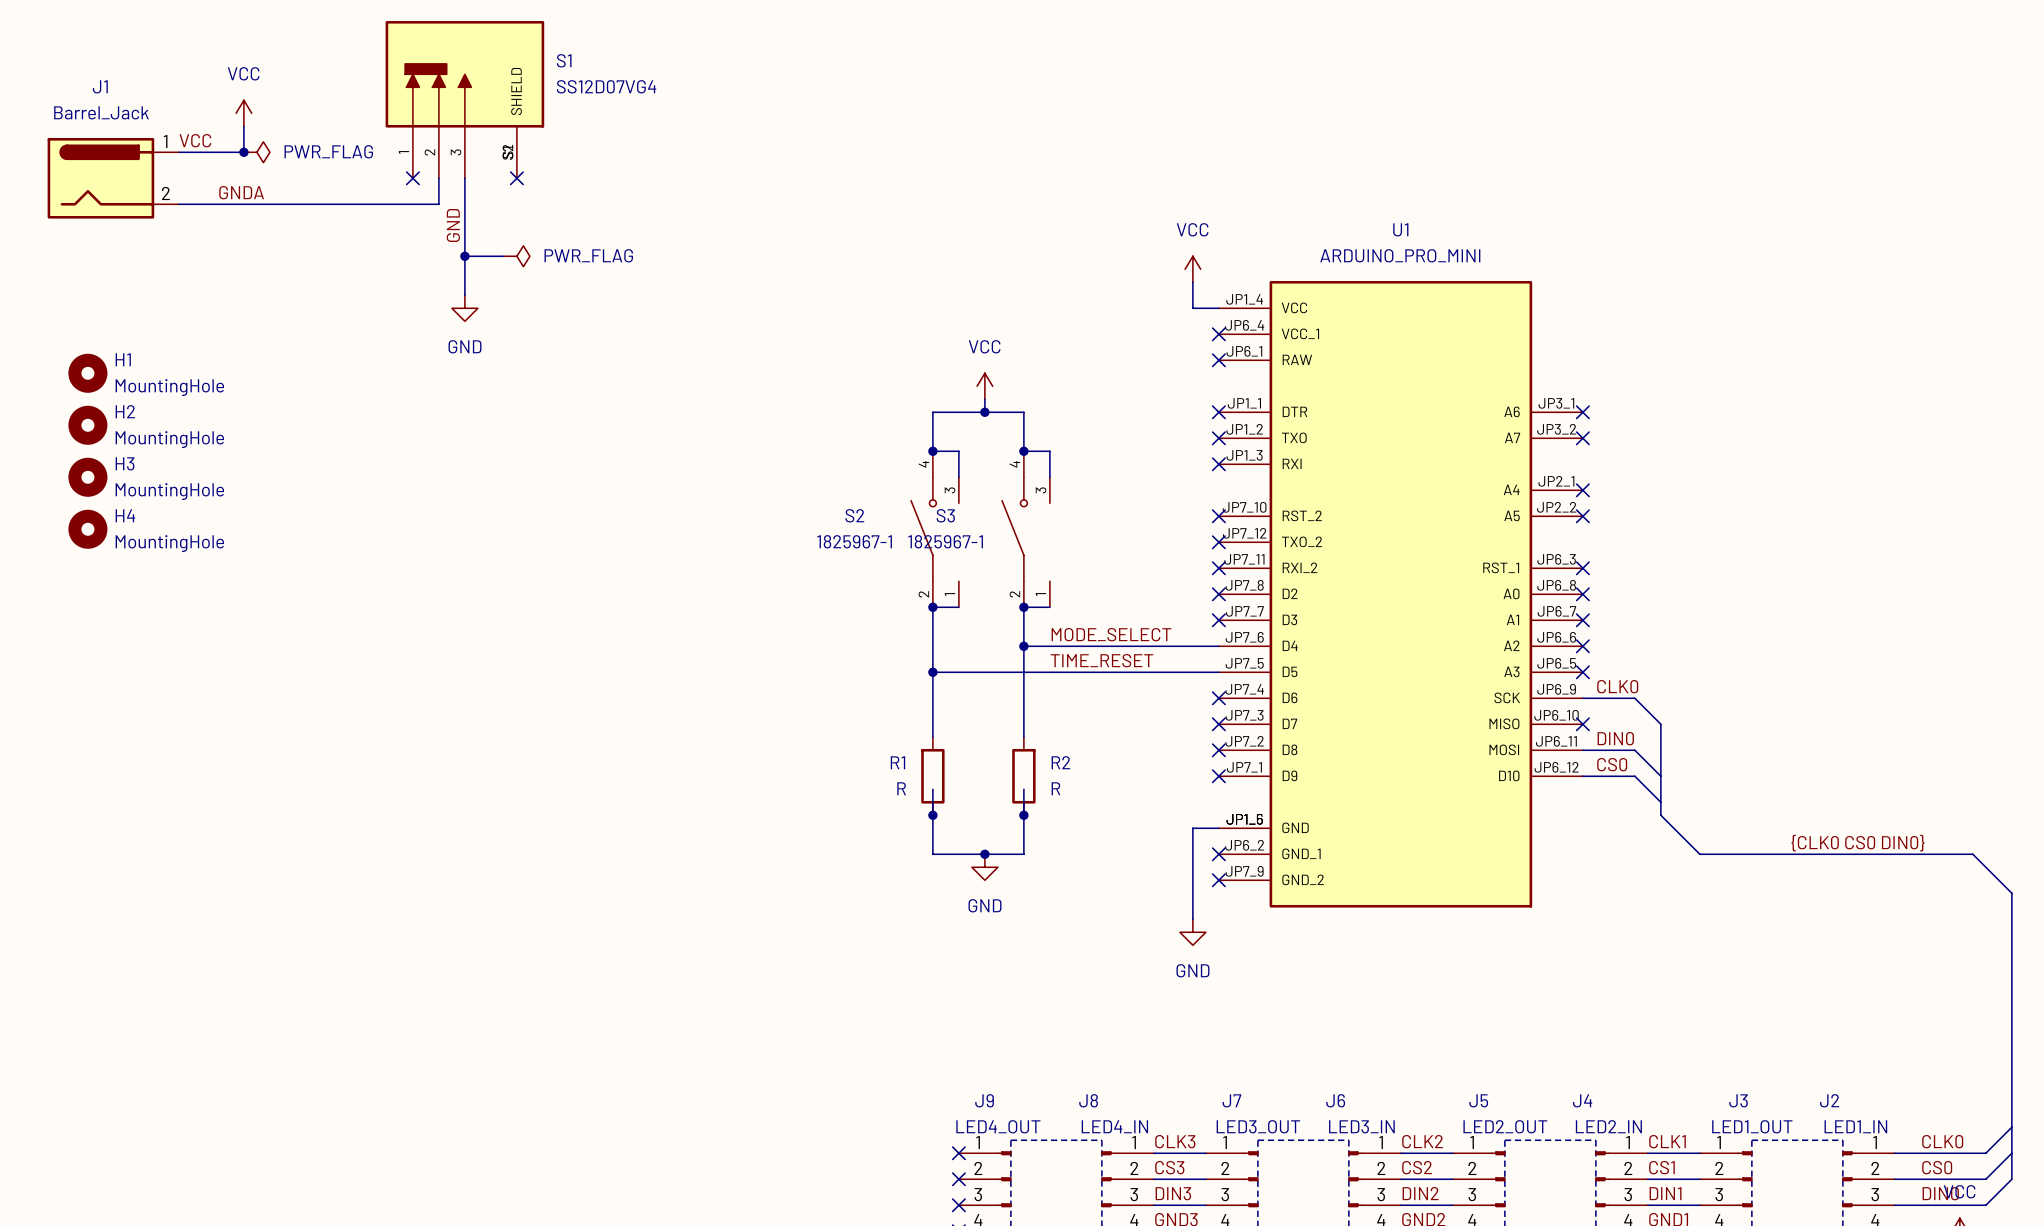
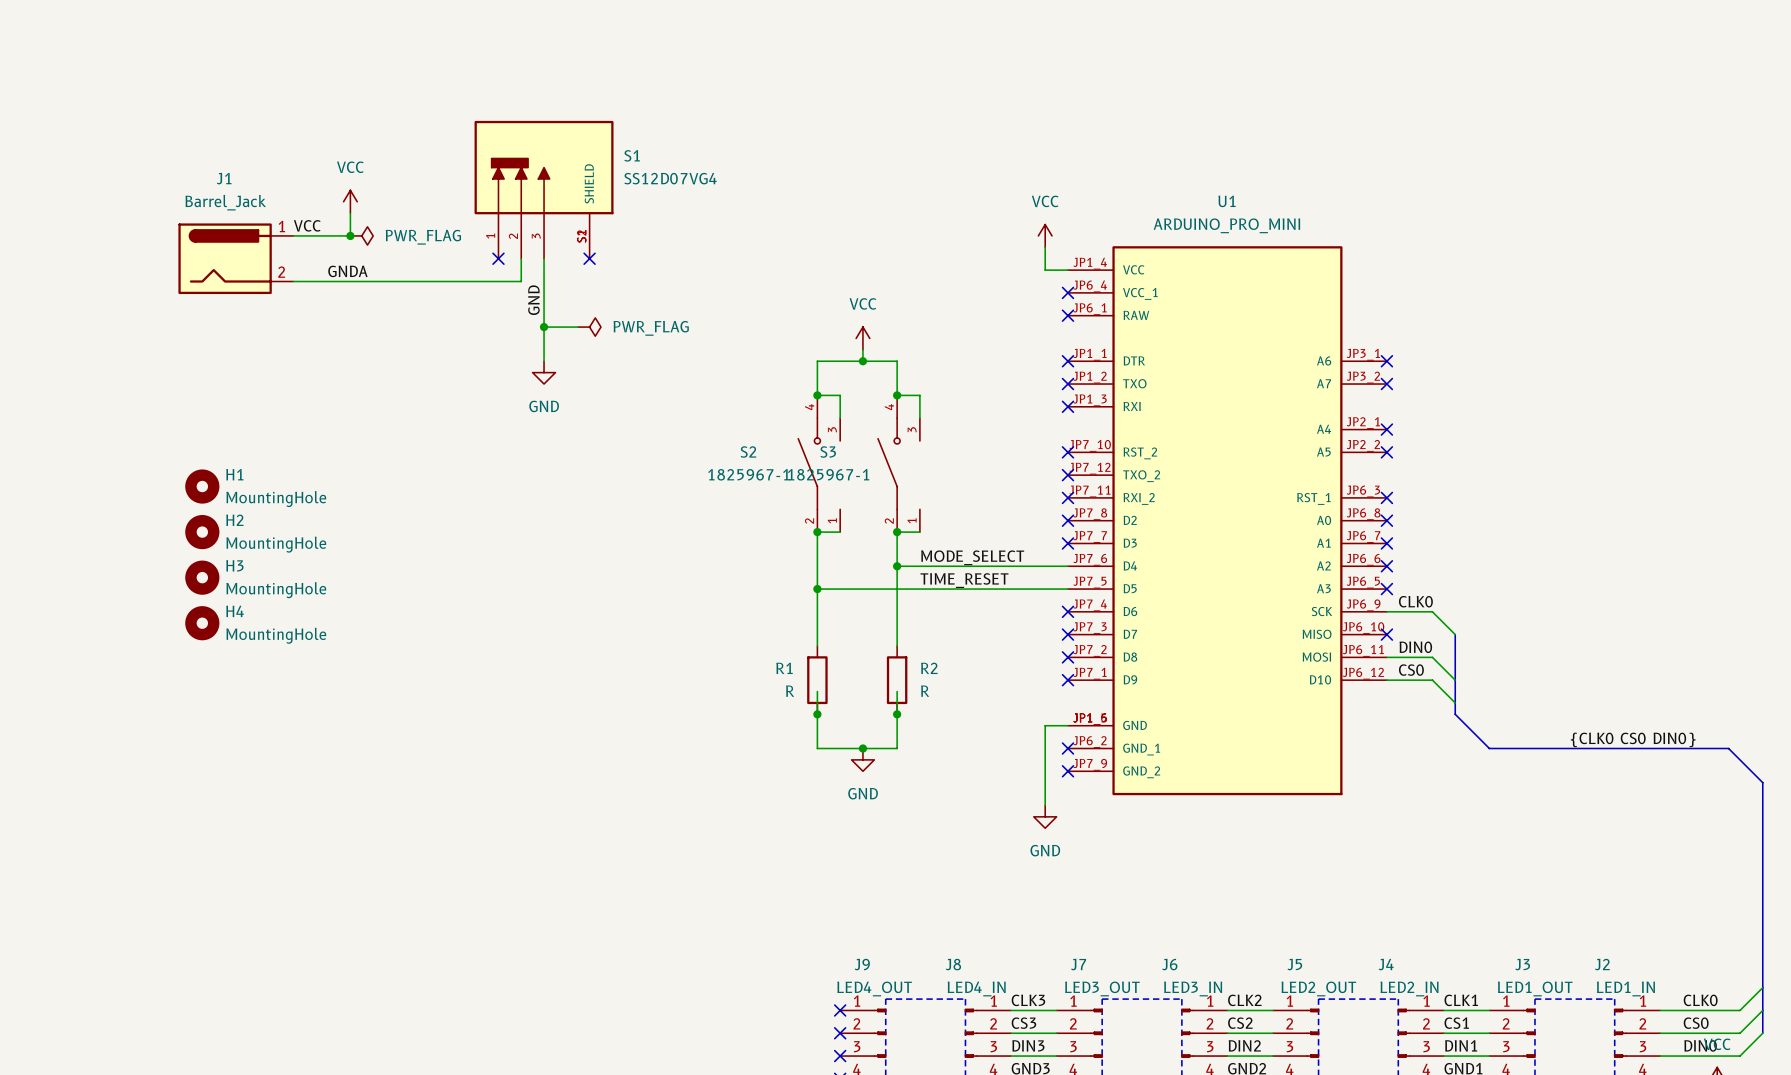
S1 position: (464, 99) -> (544, 189)
power symbol position: VCC (243, 113) -> VCC (350, 201)
wire: (243, 126) (243, 152) (178, 152) -> (350, 213) (350, 235) (293, 235)
label position: VCC (195, 140) -> VCC (307, 225)
junction: (243, 152) -> none
power symbol: PWR_FLAG (256, 152) -> none
J1 position: (113, 178) -> (235, 258)
no-connect mark: (412, 178) -> none
wire: (438, 178) (438, 204) (178, 204) -> (521, 258) (521, 281) (293, 281)
wire: (464, 178) (464, 295) -> (544, 258) (544, 361)
no-connect mark: (516, 178) -> none
label position: GNDA (241, 192) -> GNDA (347, 271)
label position: GND (453, 225) -> GND (533, 300)
wire: (464, 256) (503, 256) -> (544, 327) (578, 327)
junction: (464, 256) -> none
power symbol: PWR_FLAG (516, 256) -> none
junction: none -> (350, 235)
power symbol: none -> PWR_FLAG (361, 235)
no-connect mark: none -> (498, 258)
no-connect mark: none -> (589, 258)
power symbol position: GND (464, 308) -> GND (544, 372)
H1 position: (87, 373) -> (202, 486)
junction: none -> (544, 327)
power symbol: none -> PWR_FLAG (589, 327)
H2 position: (87, 425) -> (202, 532)
H3 position: (87, 477) -> (202, 577)
H4 position: (87, 529) -> (202, 623)

